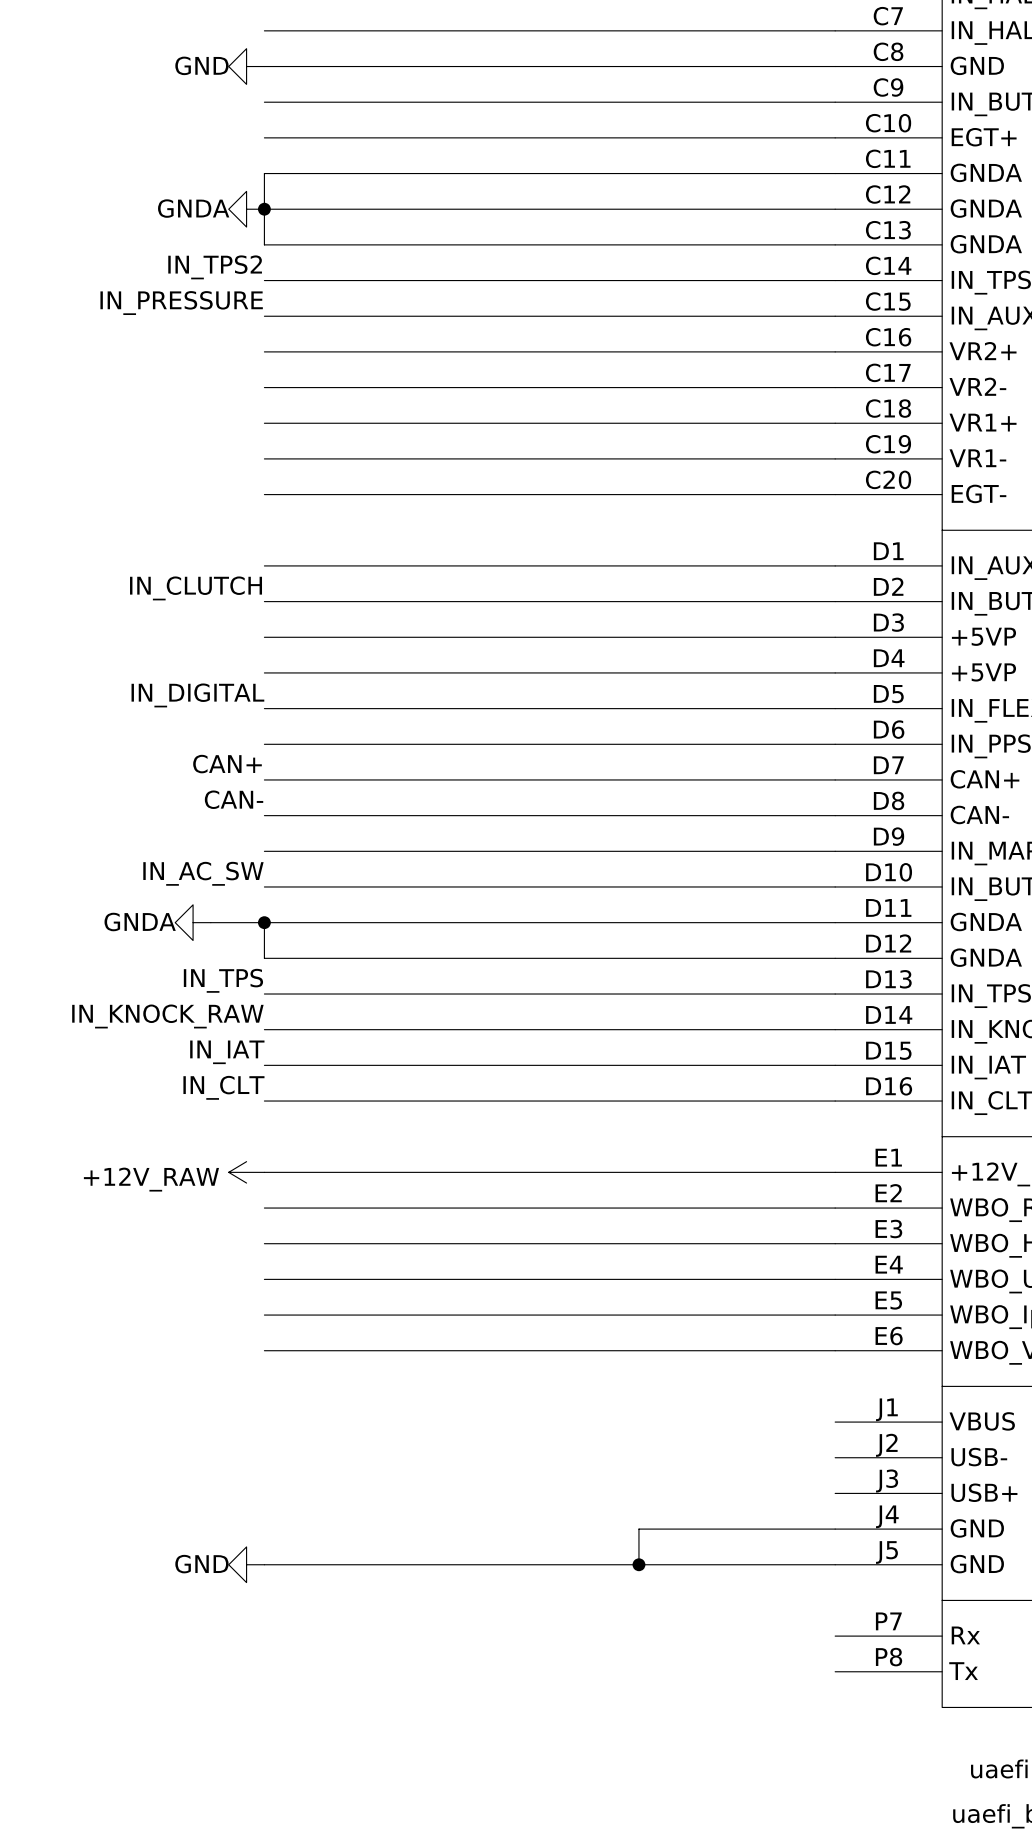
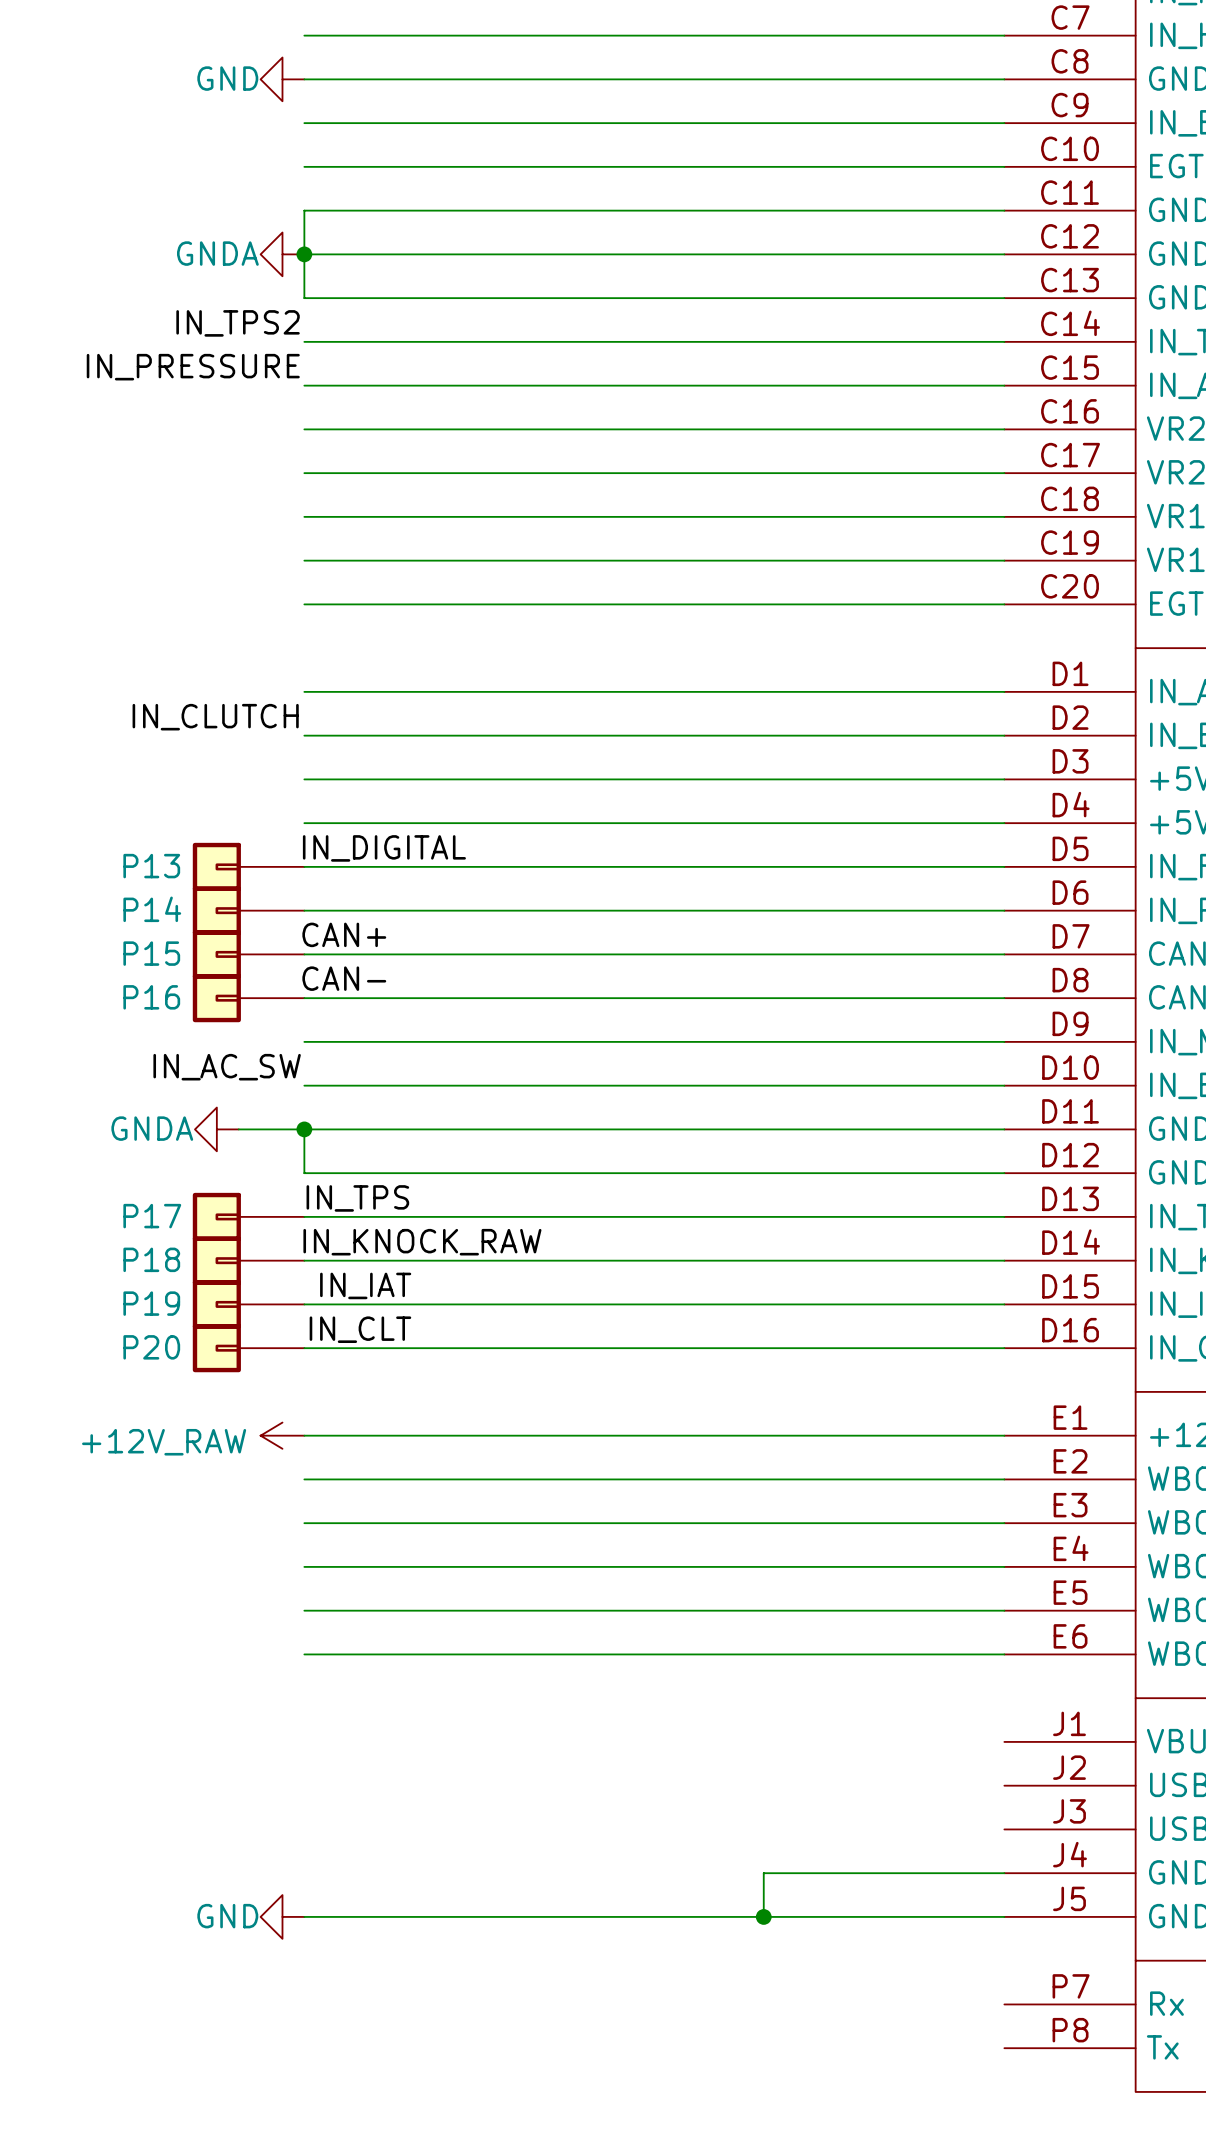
label position: IN_DIGITAL (197, 695) -> IN_DIGITAL (384, 848)
P13: none -> (248, 866)
P14: none -> (248, 910)
label position: CAN+ (227, 764) -> CAN+ (344, 934)
P15: none -> (248, 954)
label position: CAN- (234, 799) -> CAN- (344, 978)
P16: none -> (248, 998)
label position: IN_TPS (223, 980) -> IN_TPS (357, 1198)
P17: none -> (248, 1216)
label position: IN_KNOCK_RAW (167, 1016) -> IN_KNOCK_RAW (422, 1242)
P18: none -> (248, 1260)
label position: IN_IAT (227, 1052) -> IN_IAT (365, 1285)
P19: none -> (248, 1304)
label position: IN_CLT (223, 1087) -> IN_CLT (360, 1329)
P20: none -> (248, 1348)

